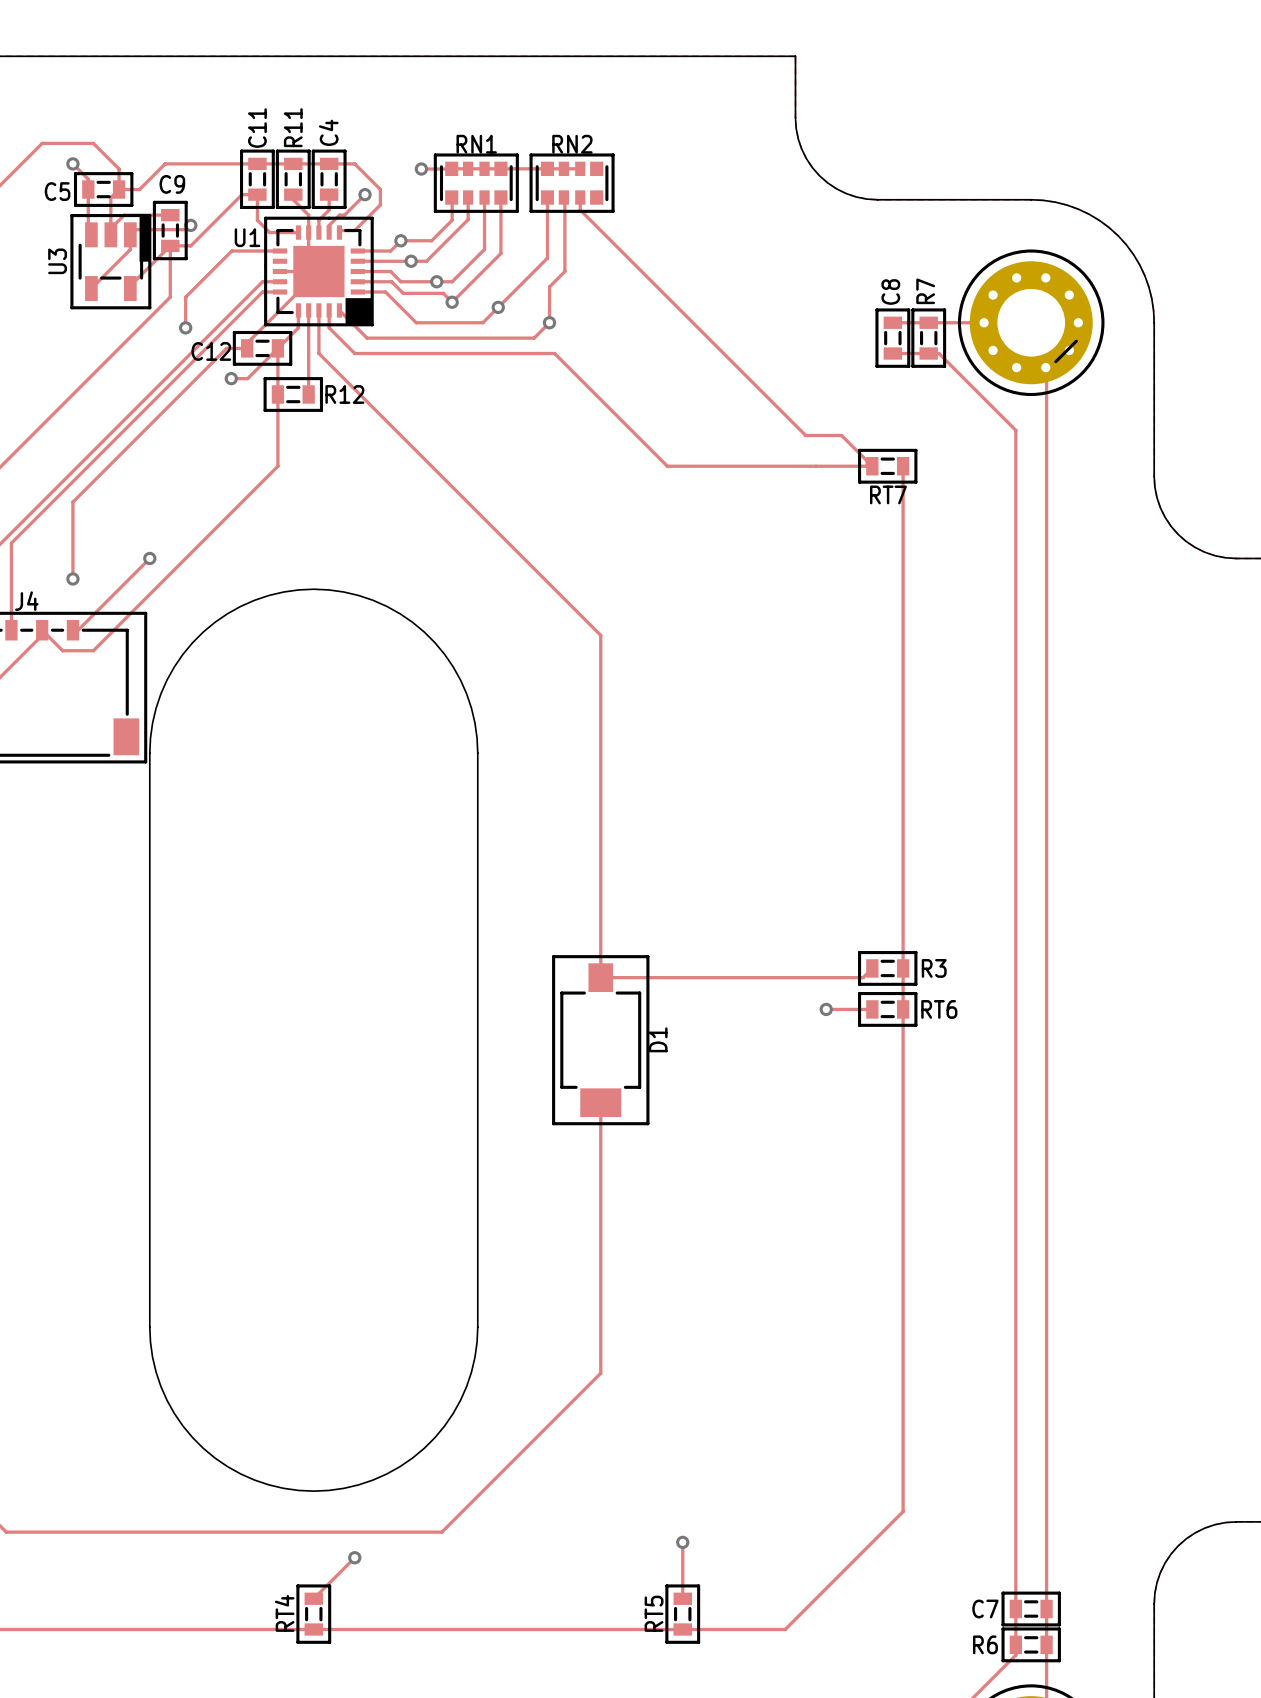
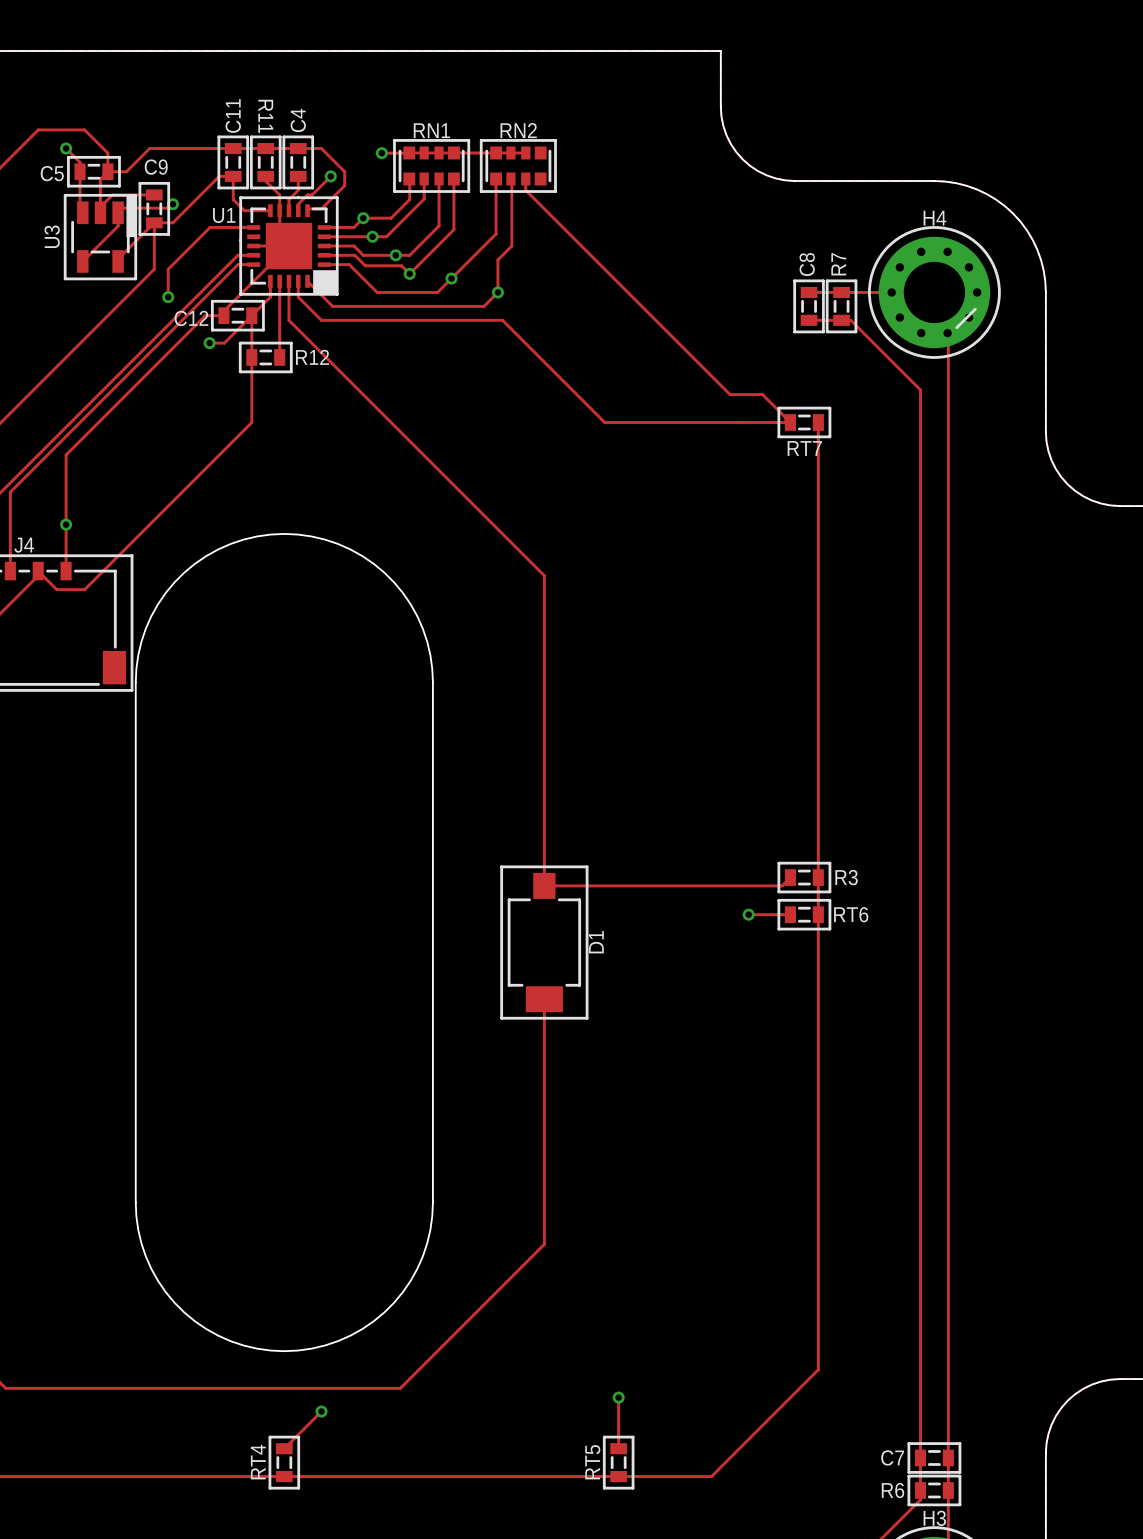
R11 name rotation: 0° (293, 127) -> 180° (265, 116)
H4 name: none -> H4 (934, 218)
track: (149, 558) (78, 630) (72, 630) -> (66, 524) (66, 571)
via: (149, 558) -> none
H3 name: none -> H3 (934, 1518)

